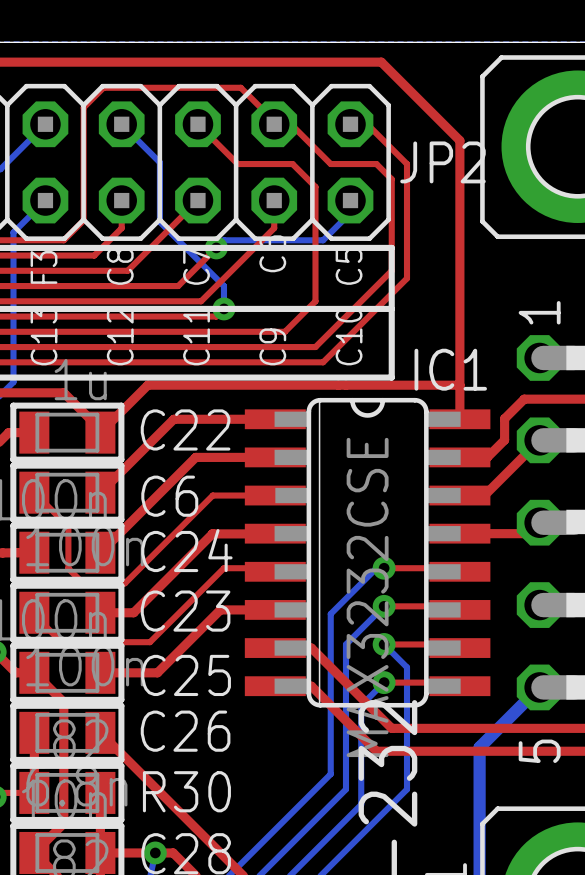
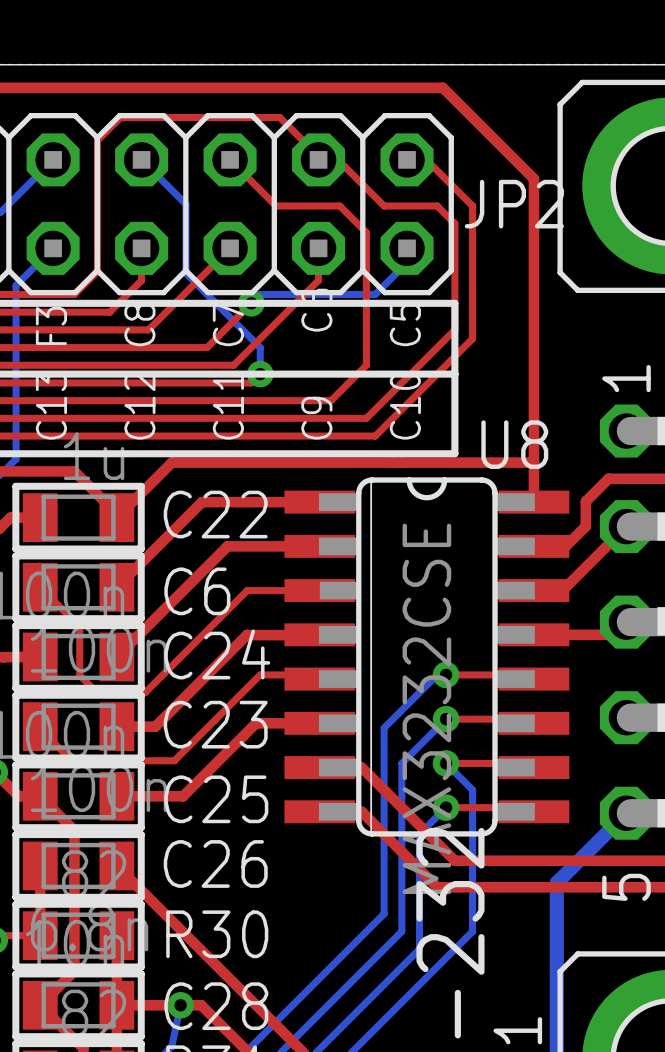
IC1 name: IC1 (450, 369) -> U8 (514, 444)

